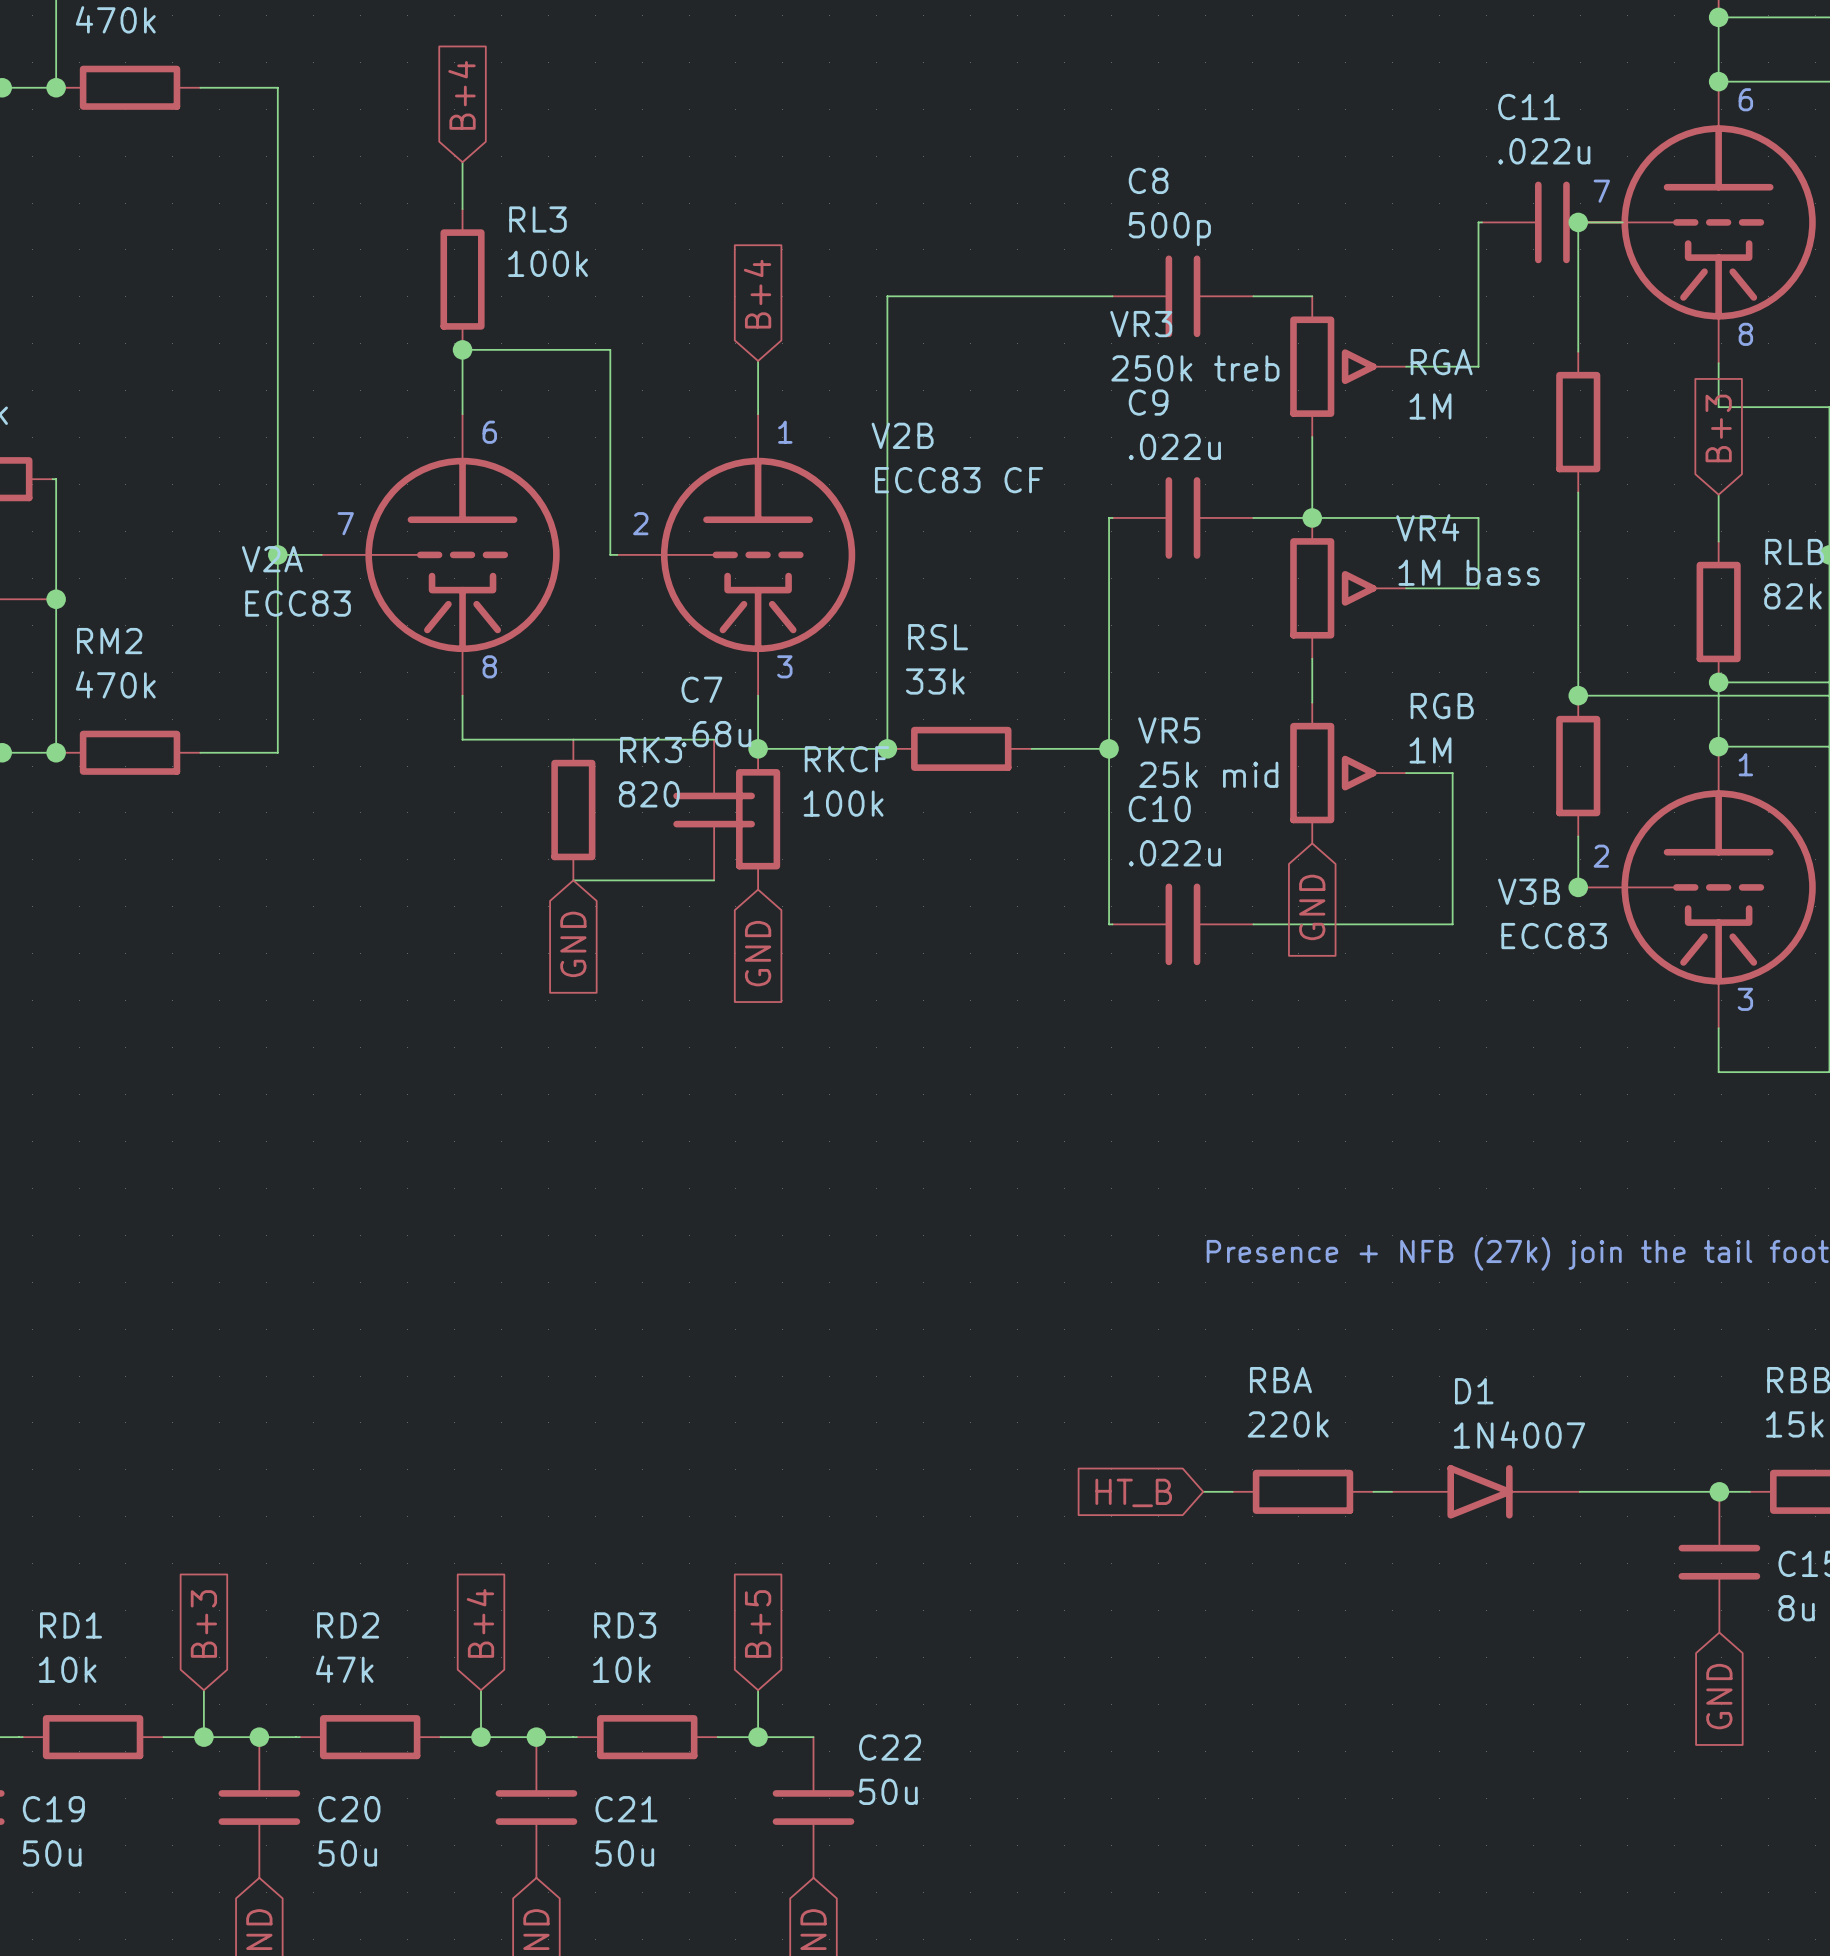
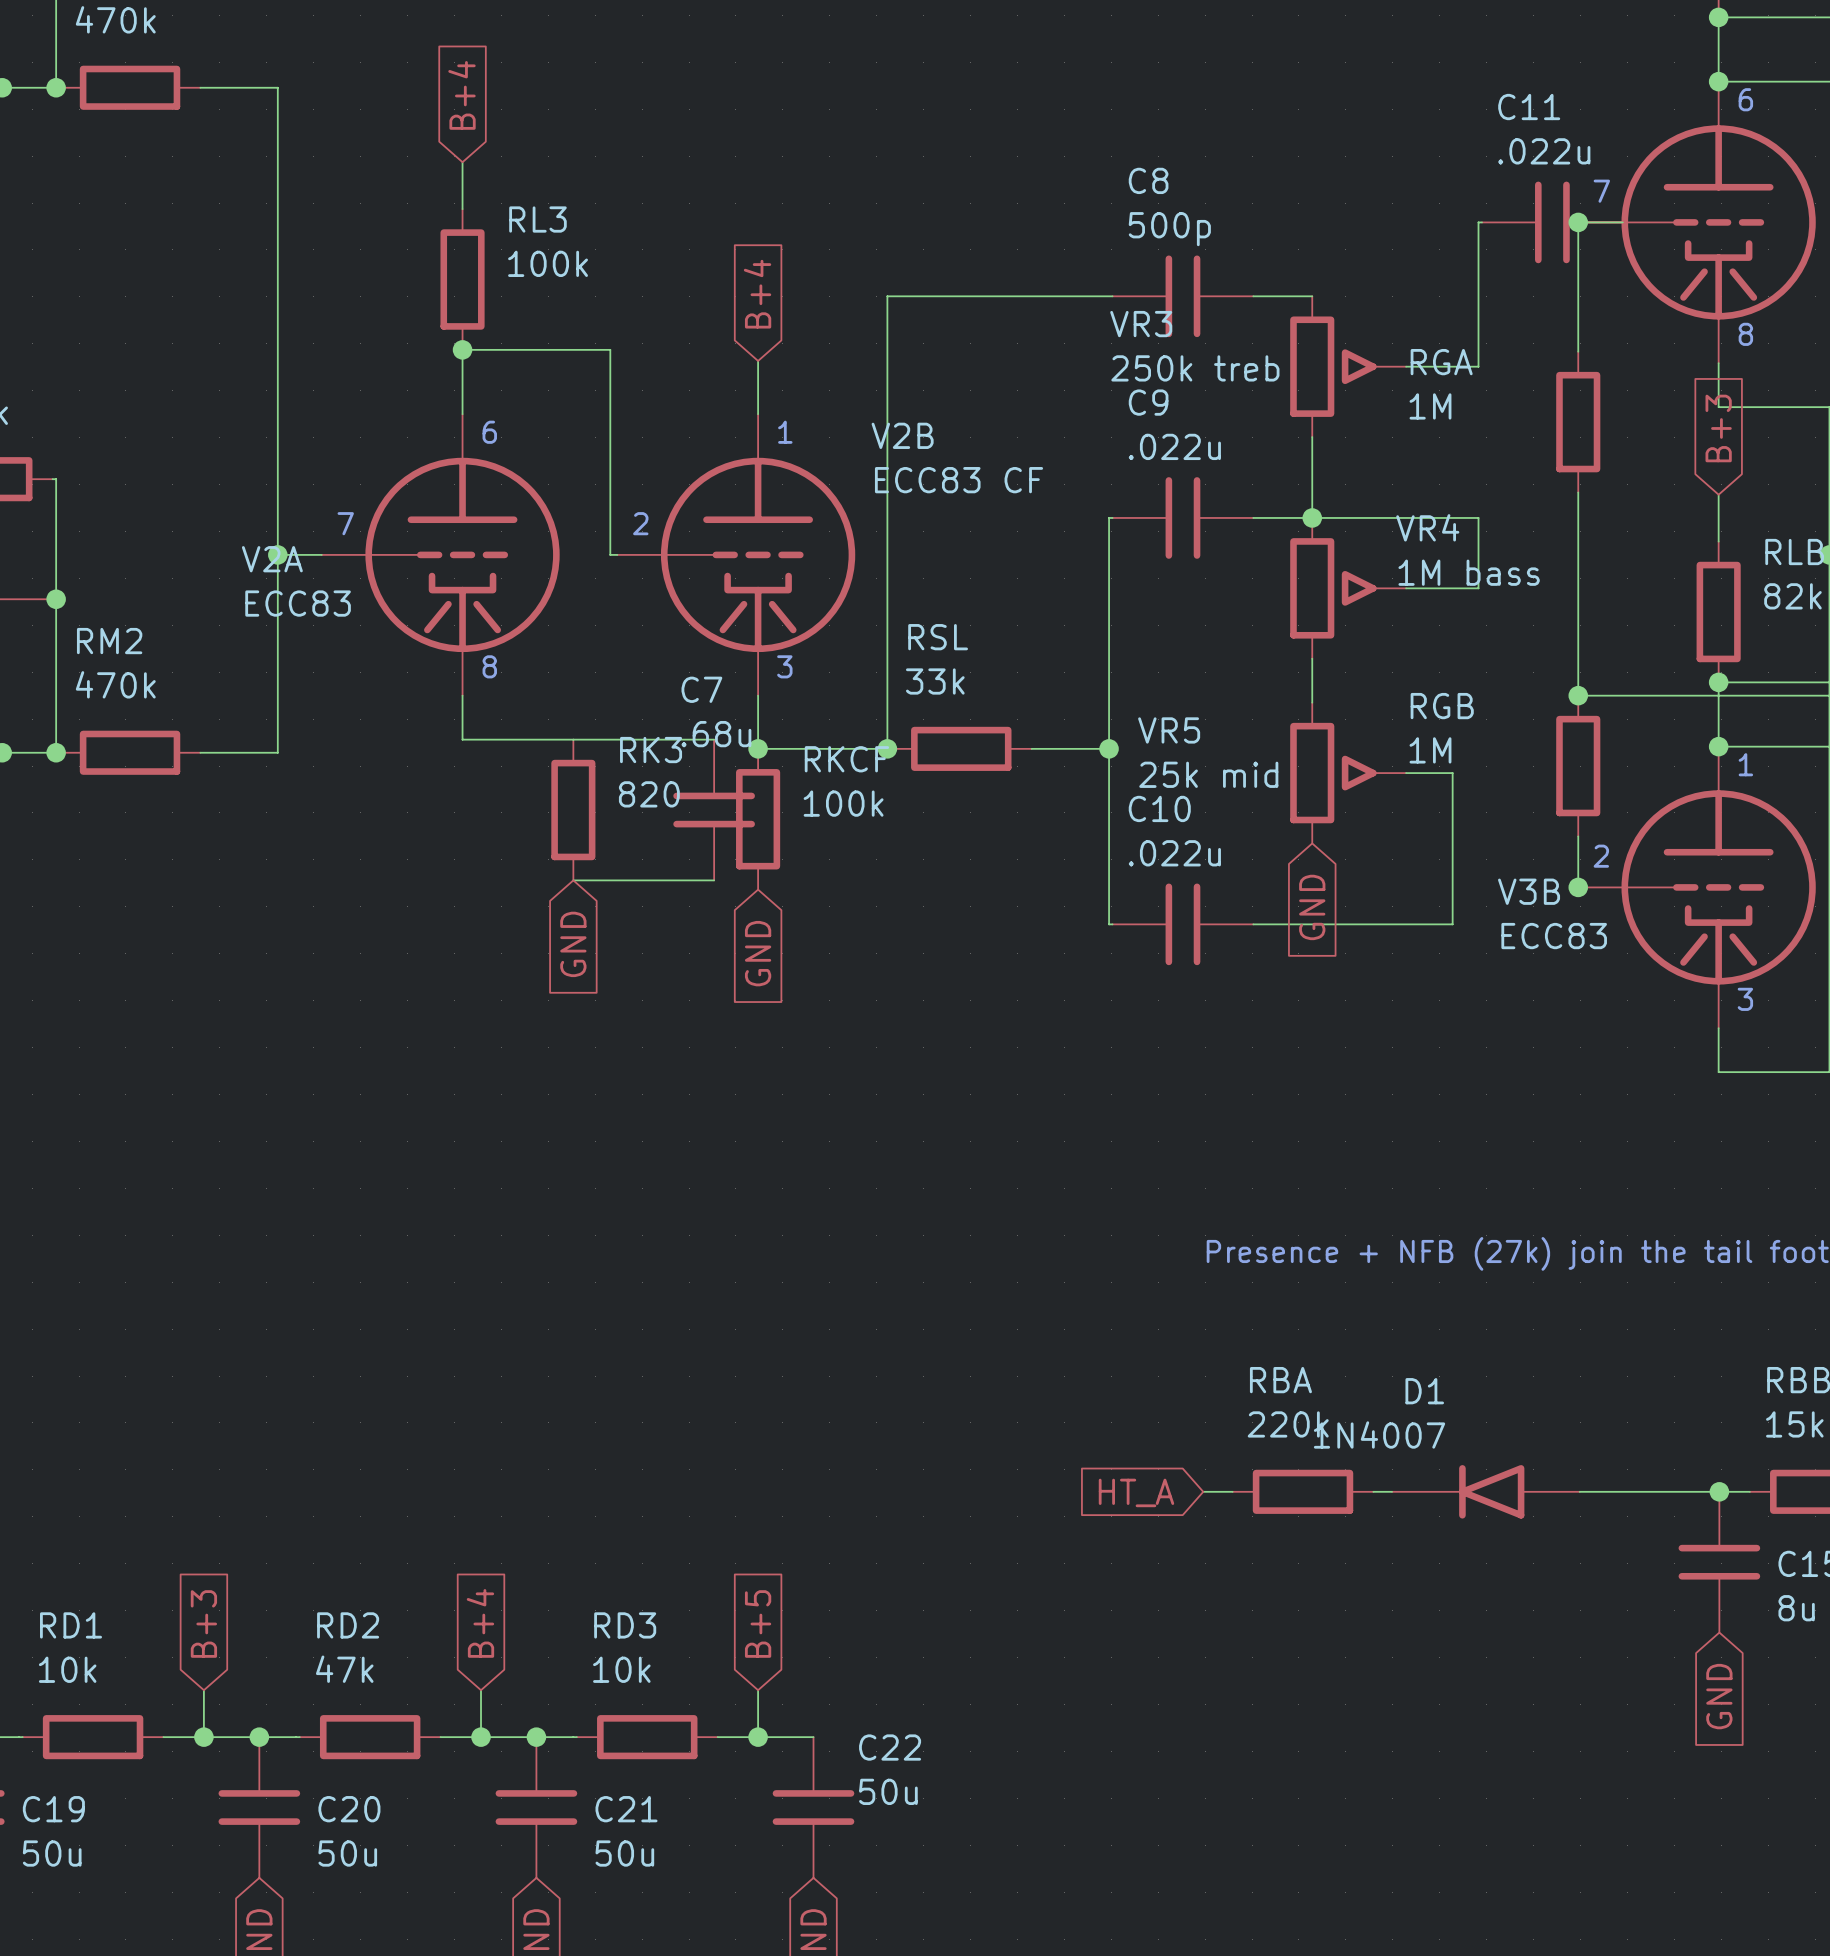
D1 name position: D1 (1474, 1391) -> D1 (1424, 1391)
D1 value position: 1N4007 (1519, 1434) -> 1N4007 (1379, 1434)
D1 rotation: 0° (1480, 1491) -> 180° (1491, 1491)
global label: HT_B (1133, 1492) -> HT_A (1136, 1492)

